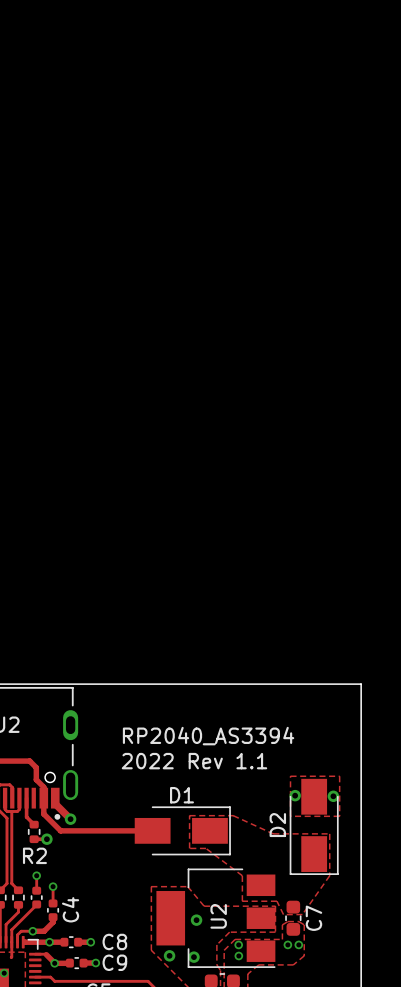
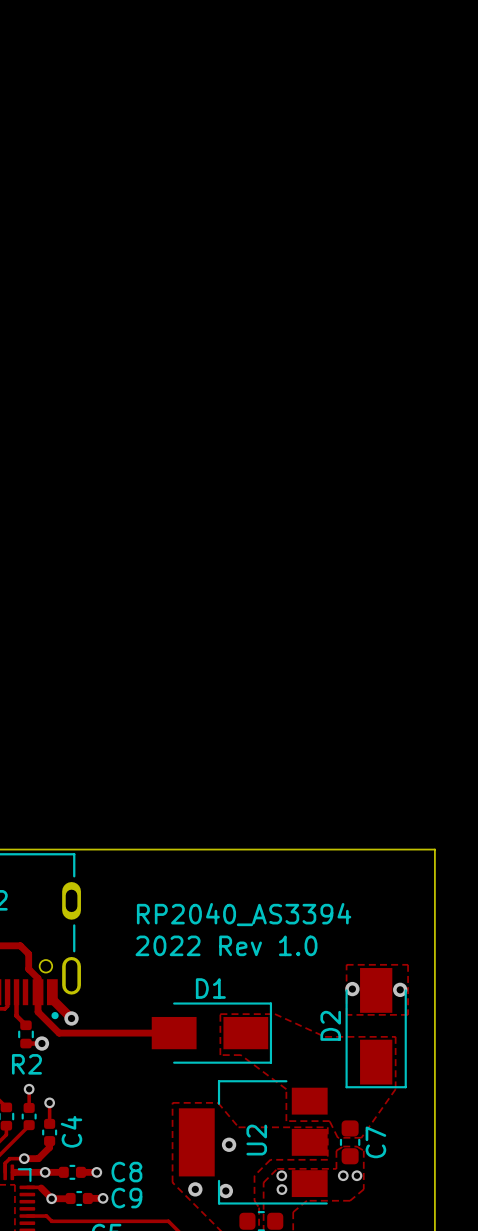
text: 2022 Rev 1.1 (194, 761) -> 2022 Rev 1.0 (226, 945)

